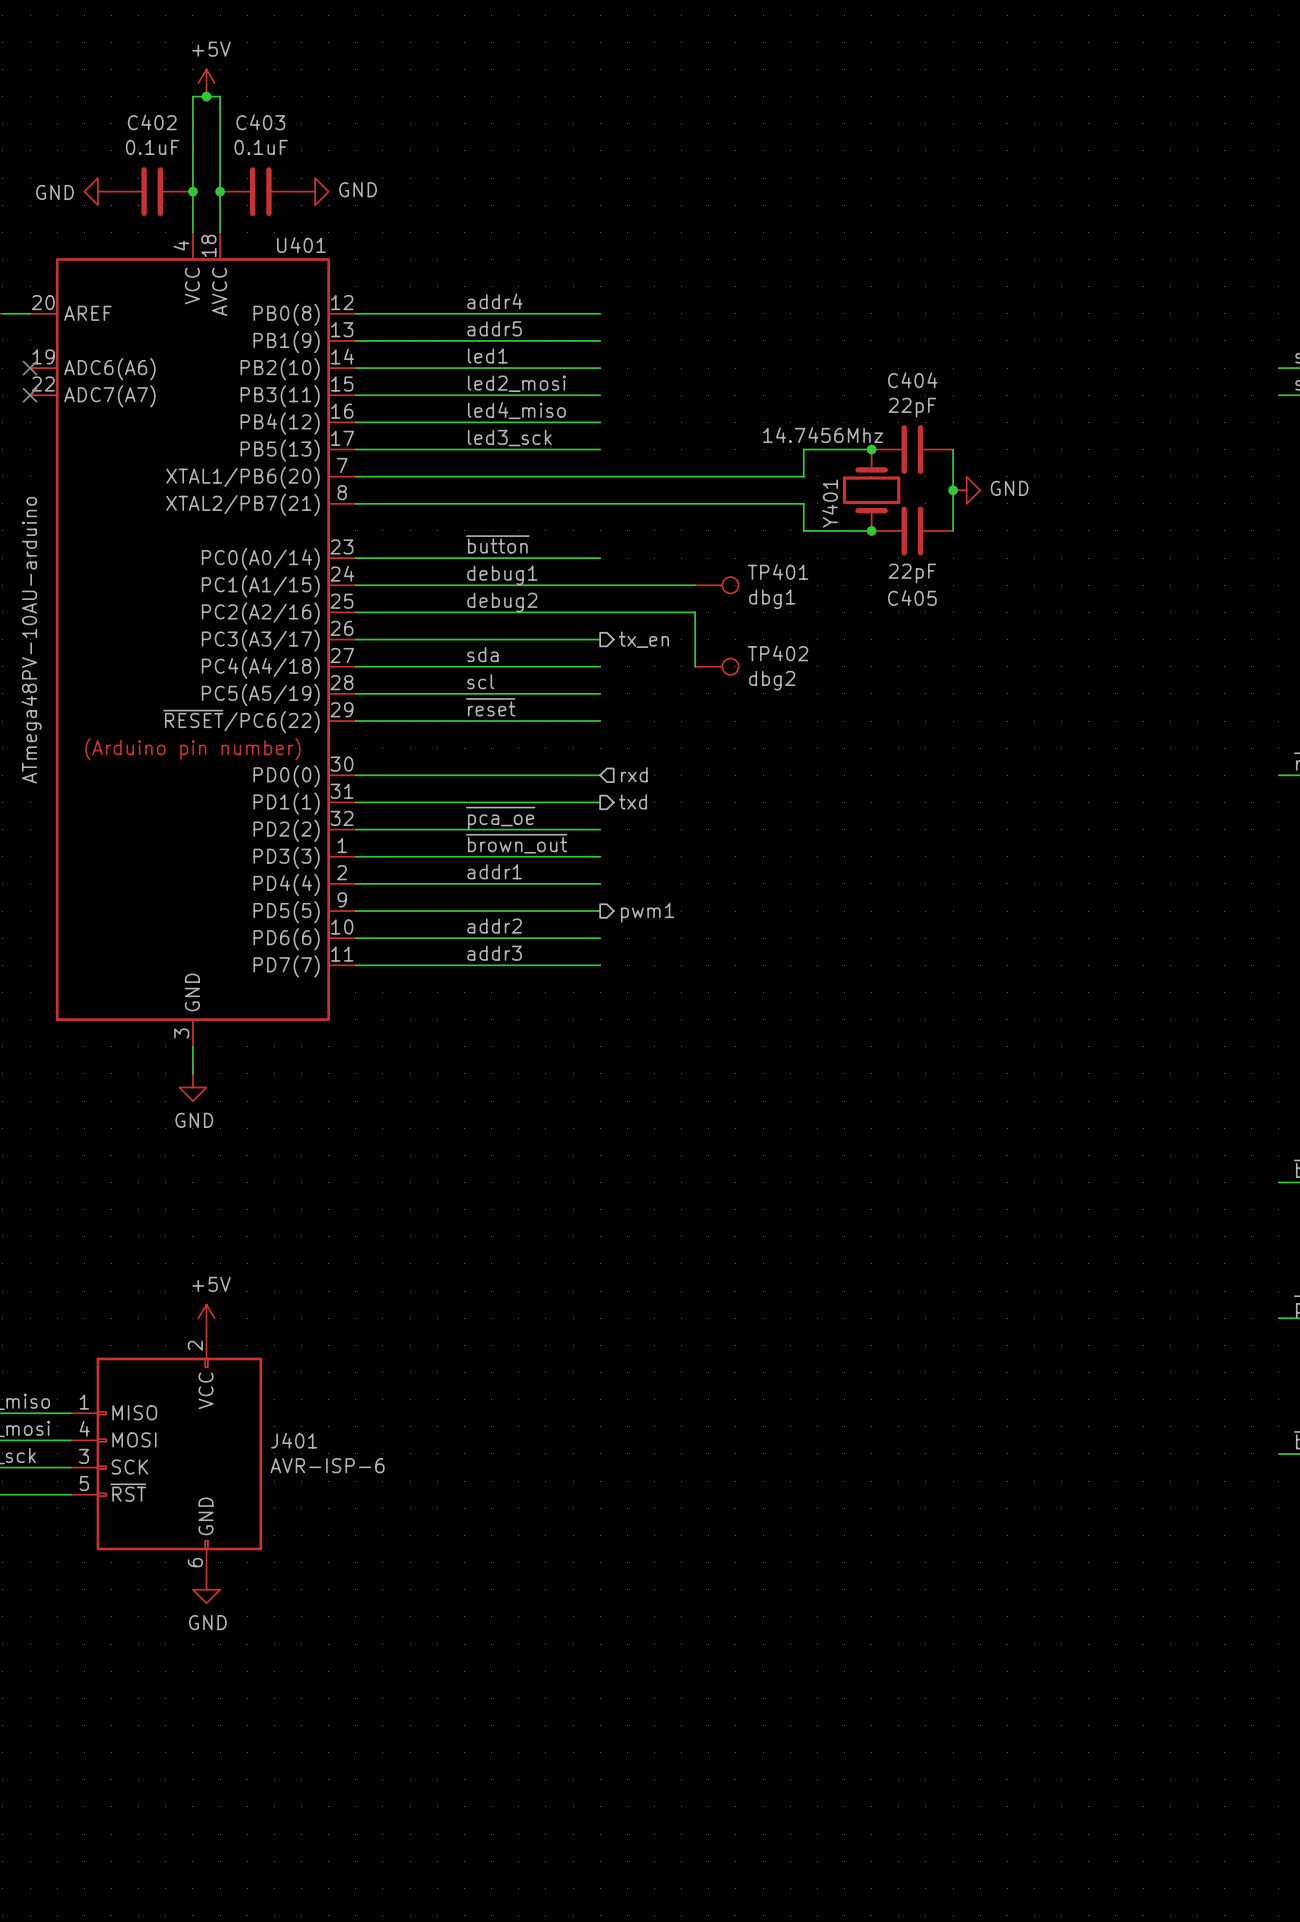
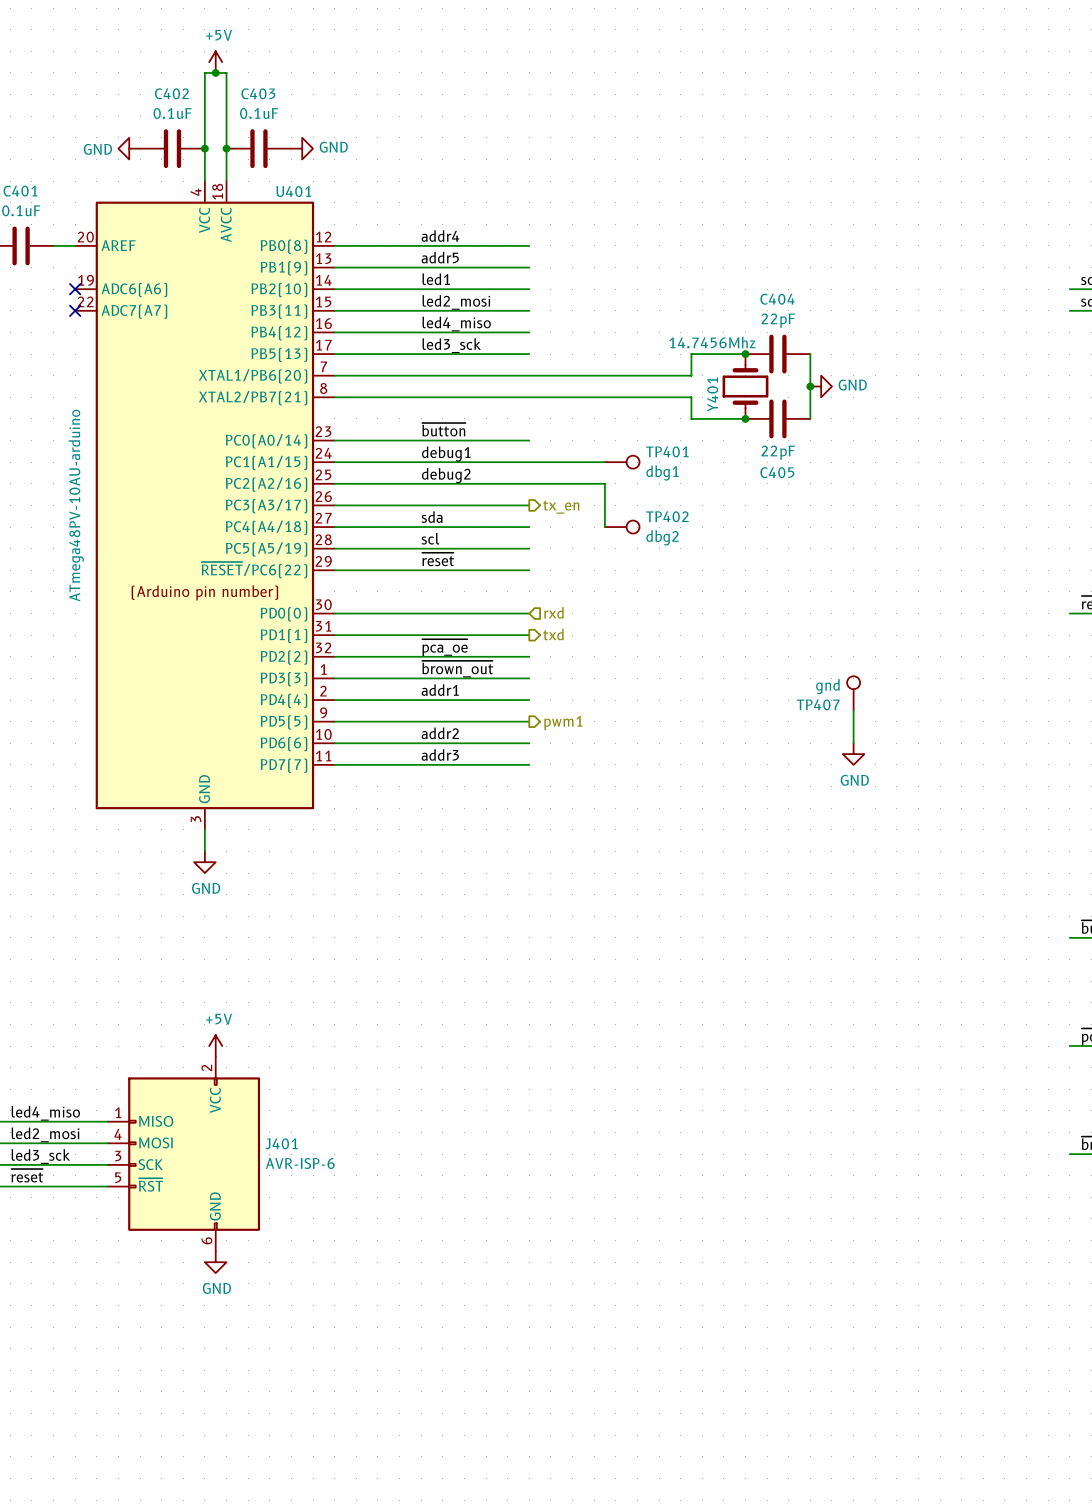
TP407: none -> gnd (853, 693)
wire: none -> (853, 710) (853, 743)
power symbol: none -> GND (853, 754)

